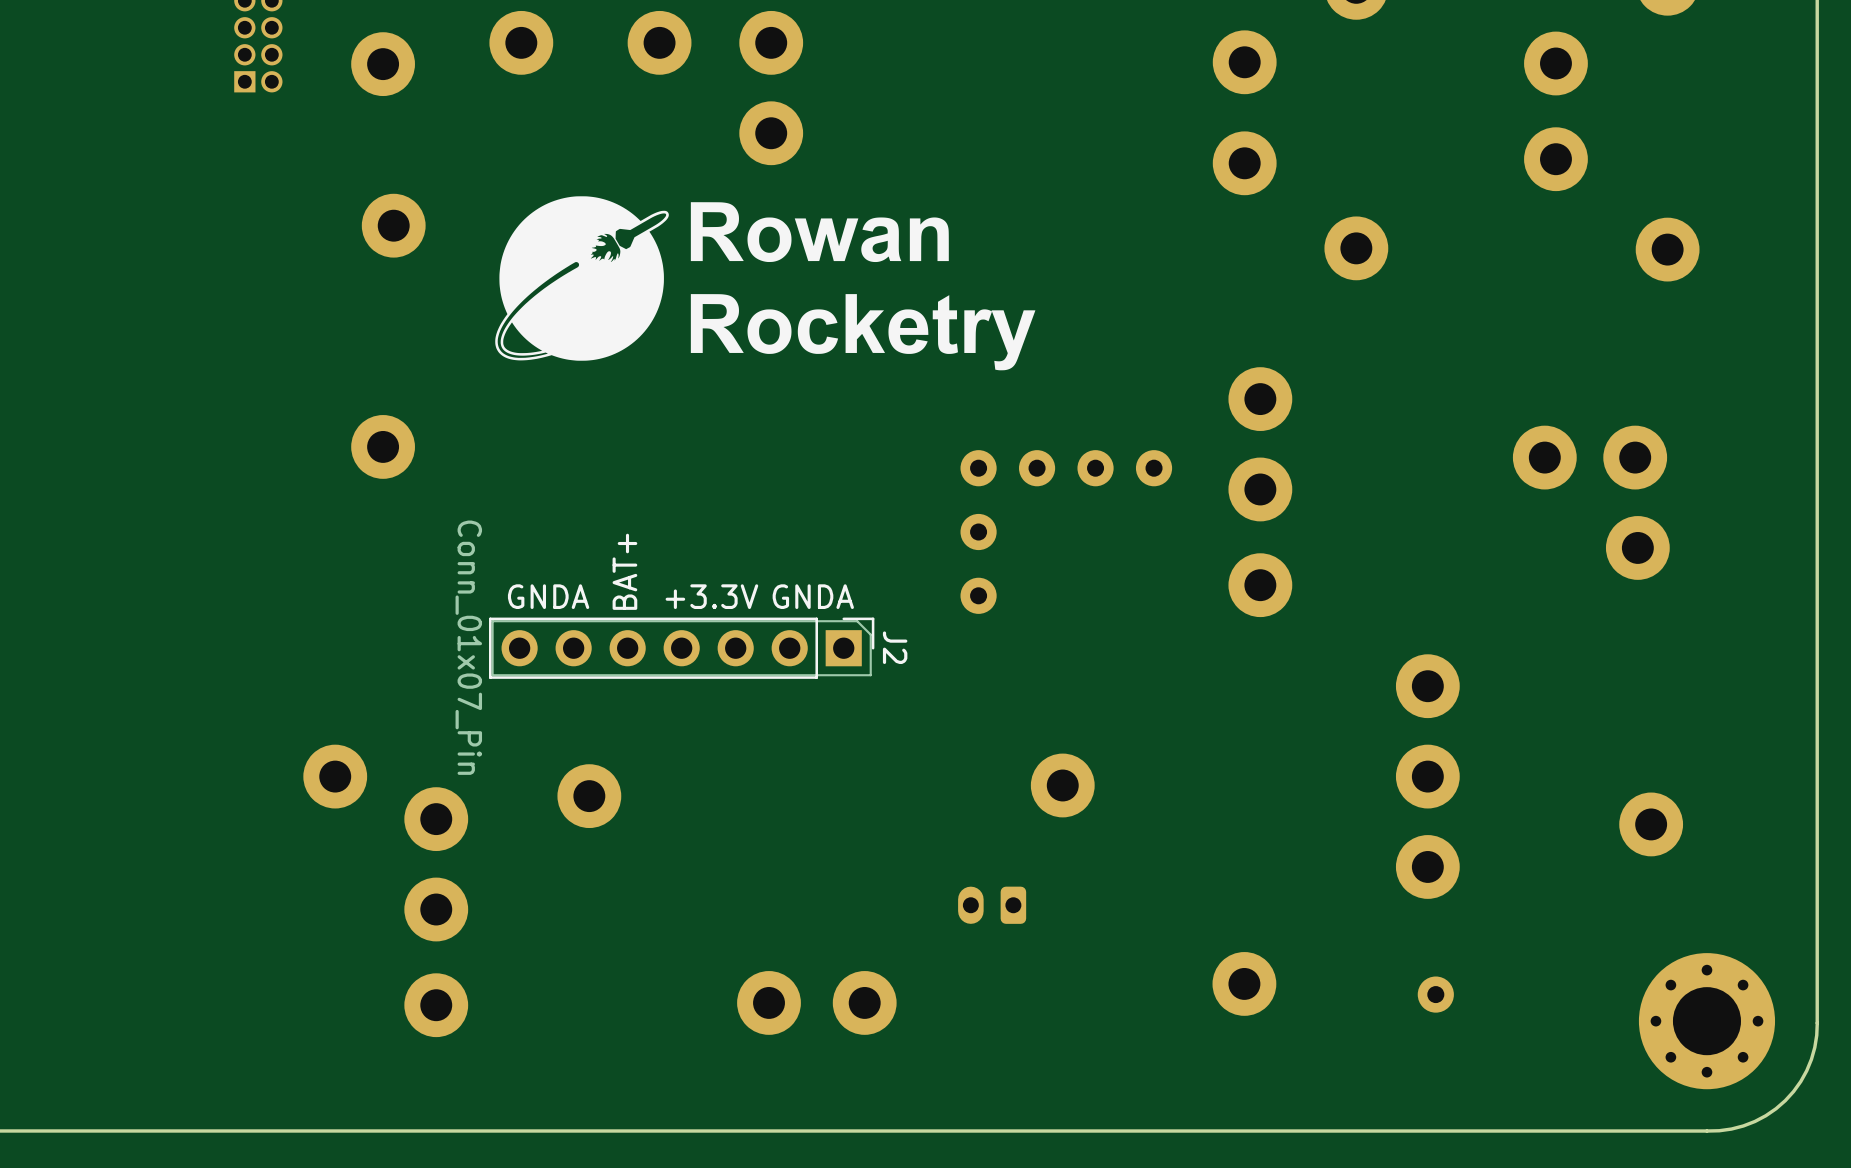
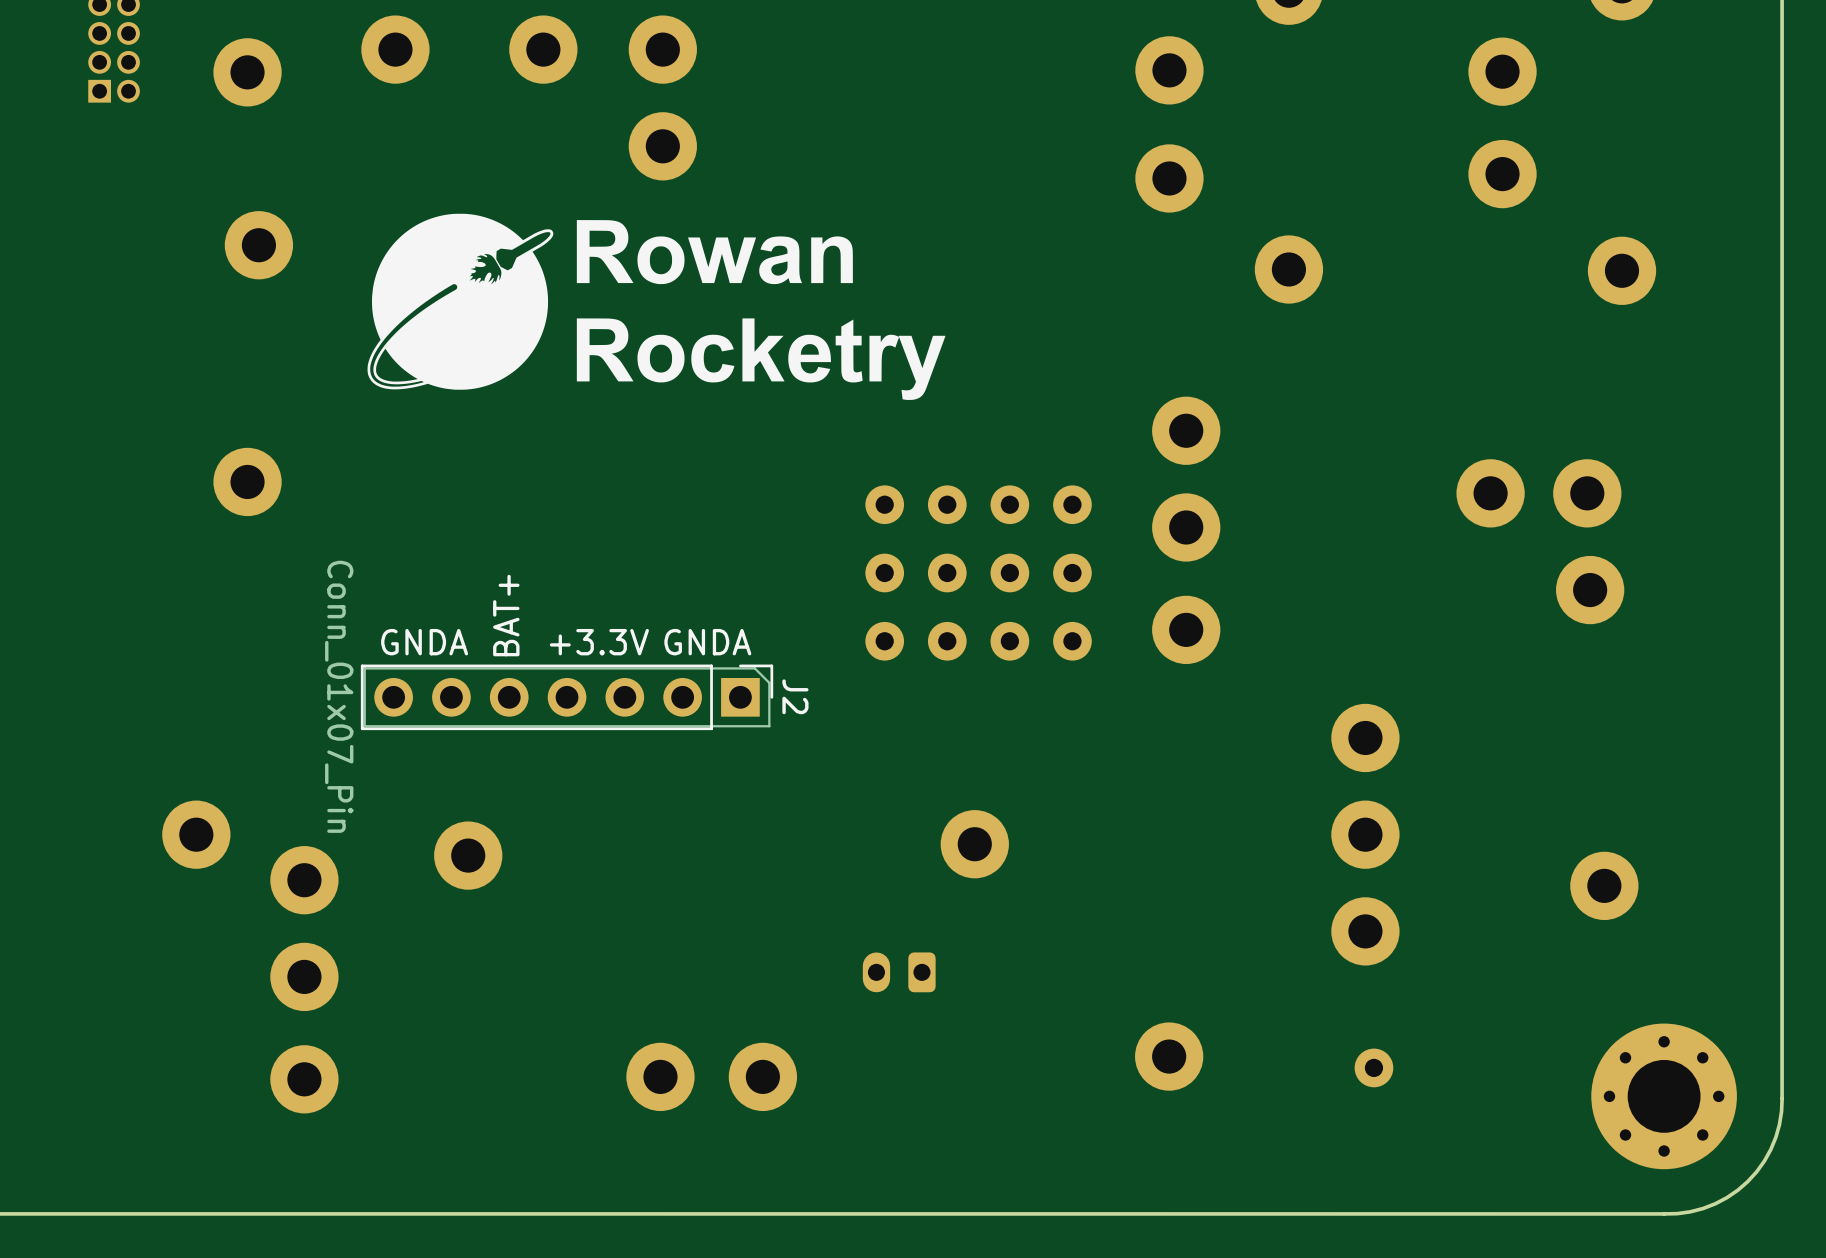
part: none -> (947, 572)
part: none -> (1009, 572)
part: none -> (1072, 572)
part: none -> (947, 641)
part: none -> (1009, 641)
part: none -> (1072, 641)

